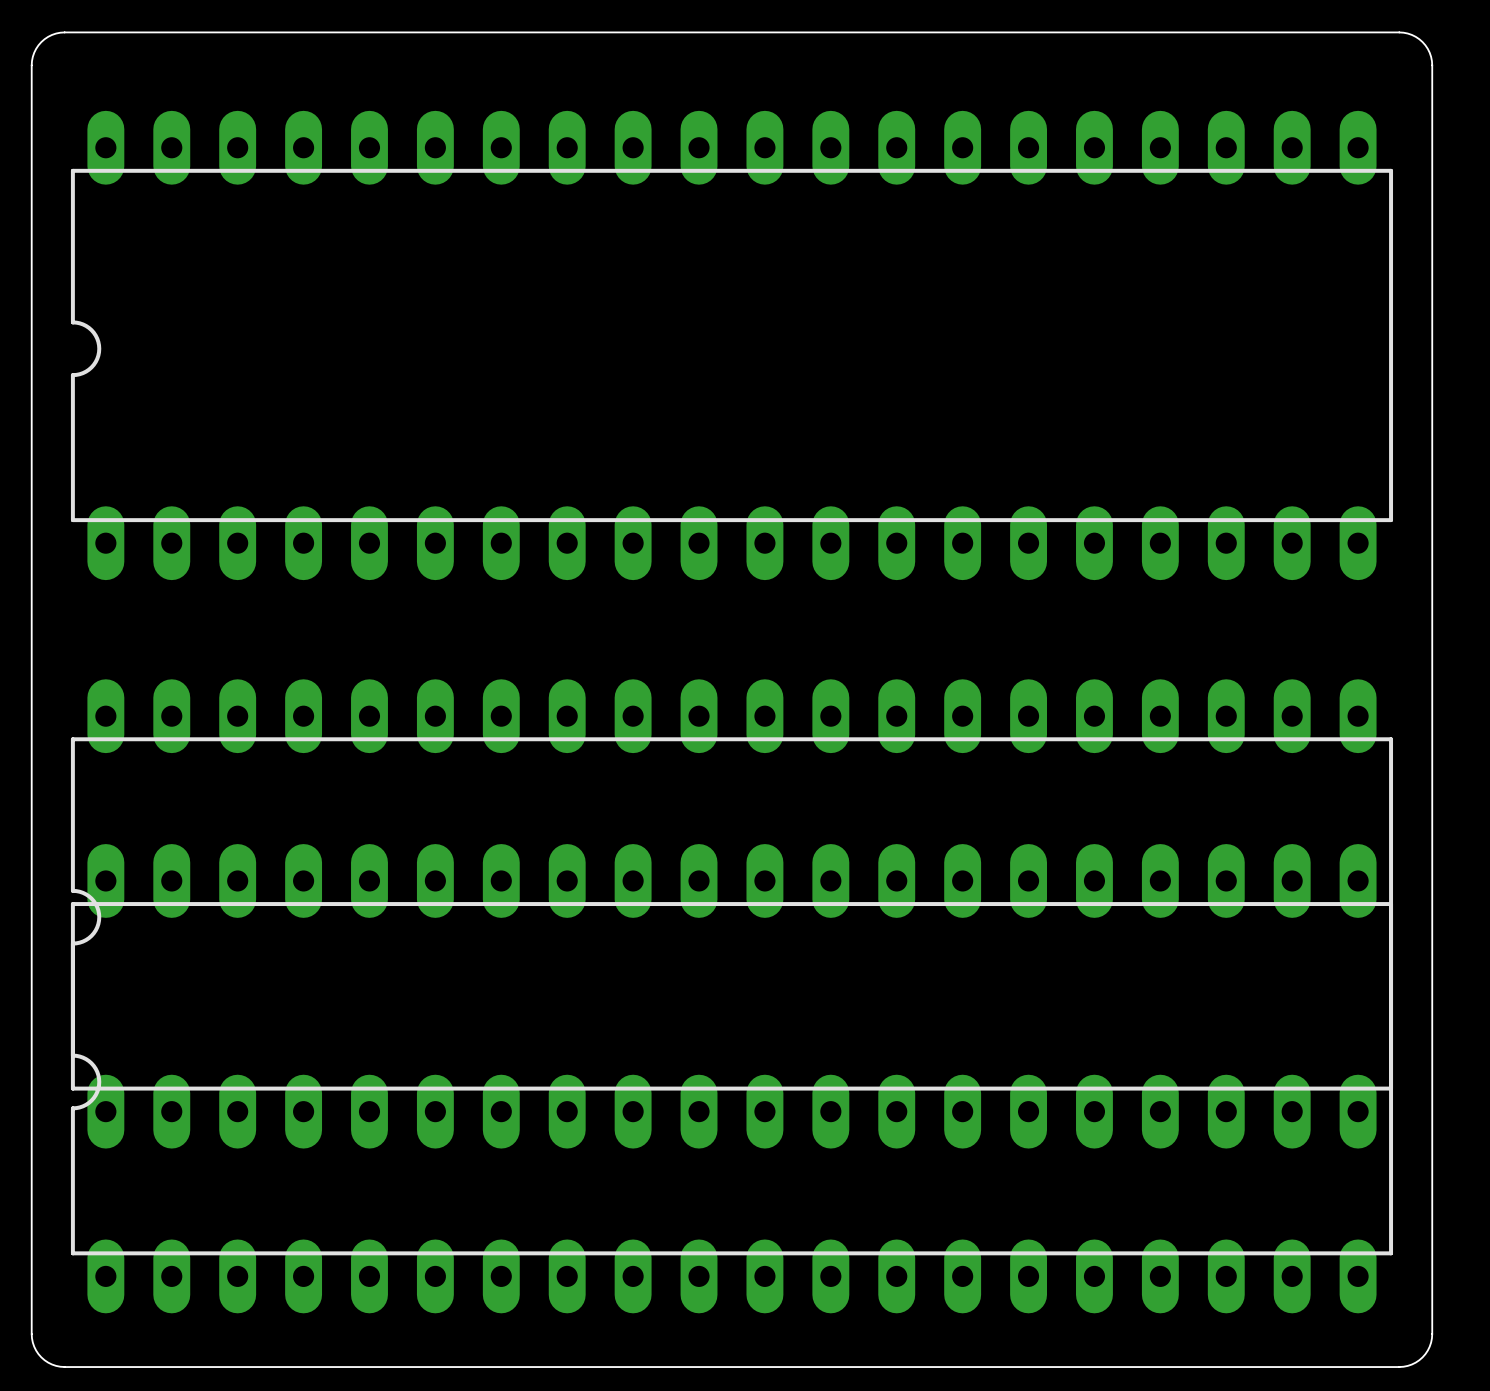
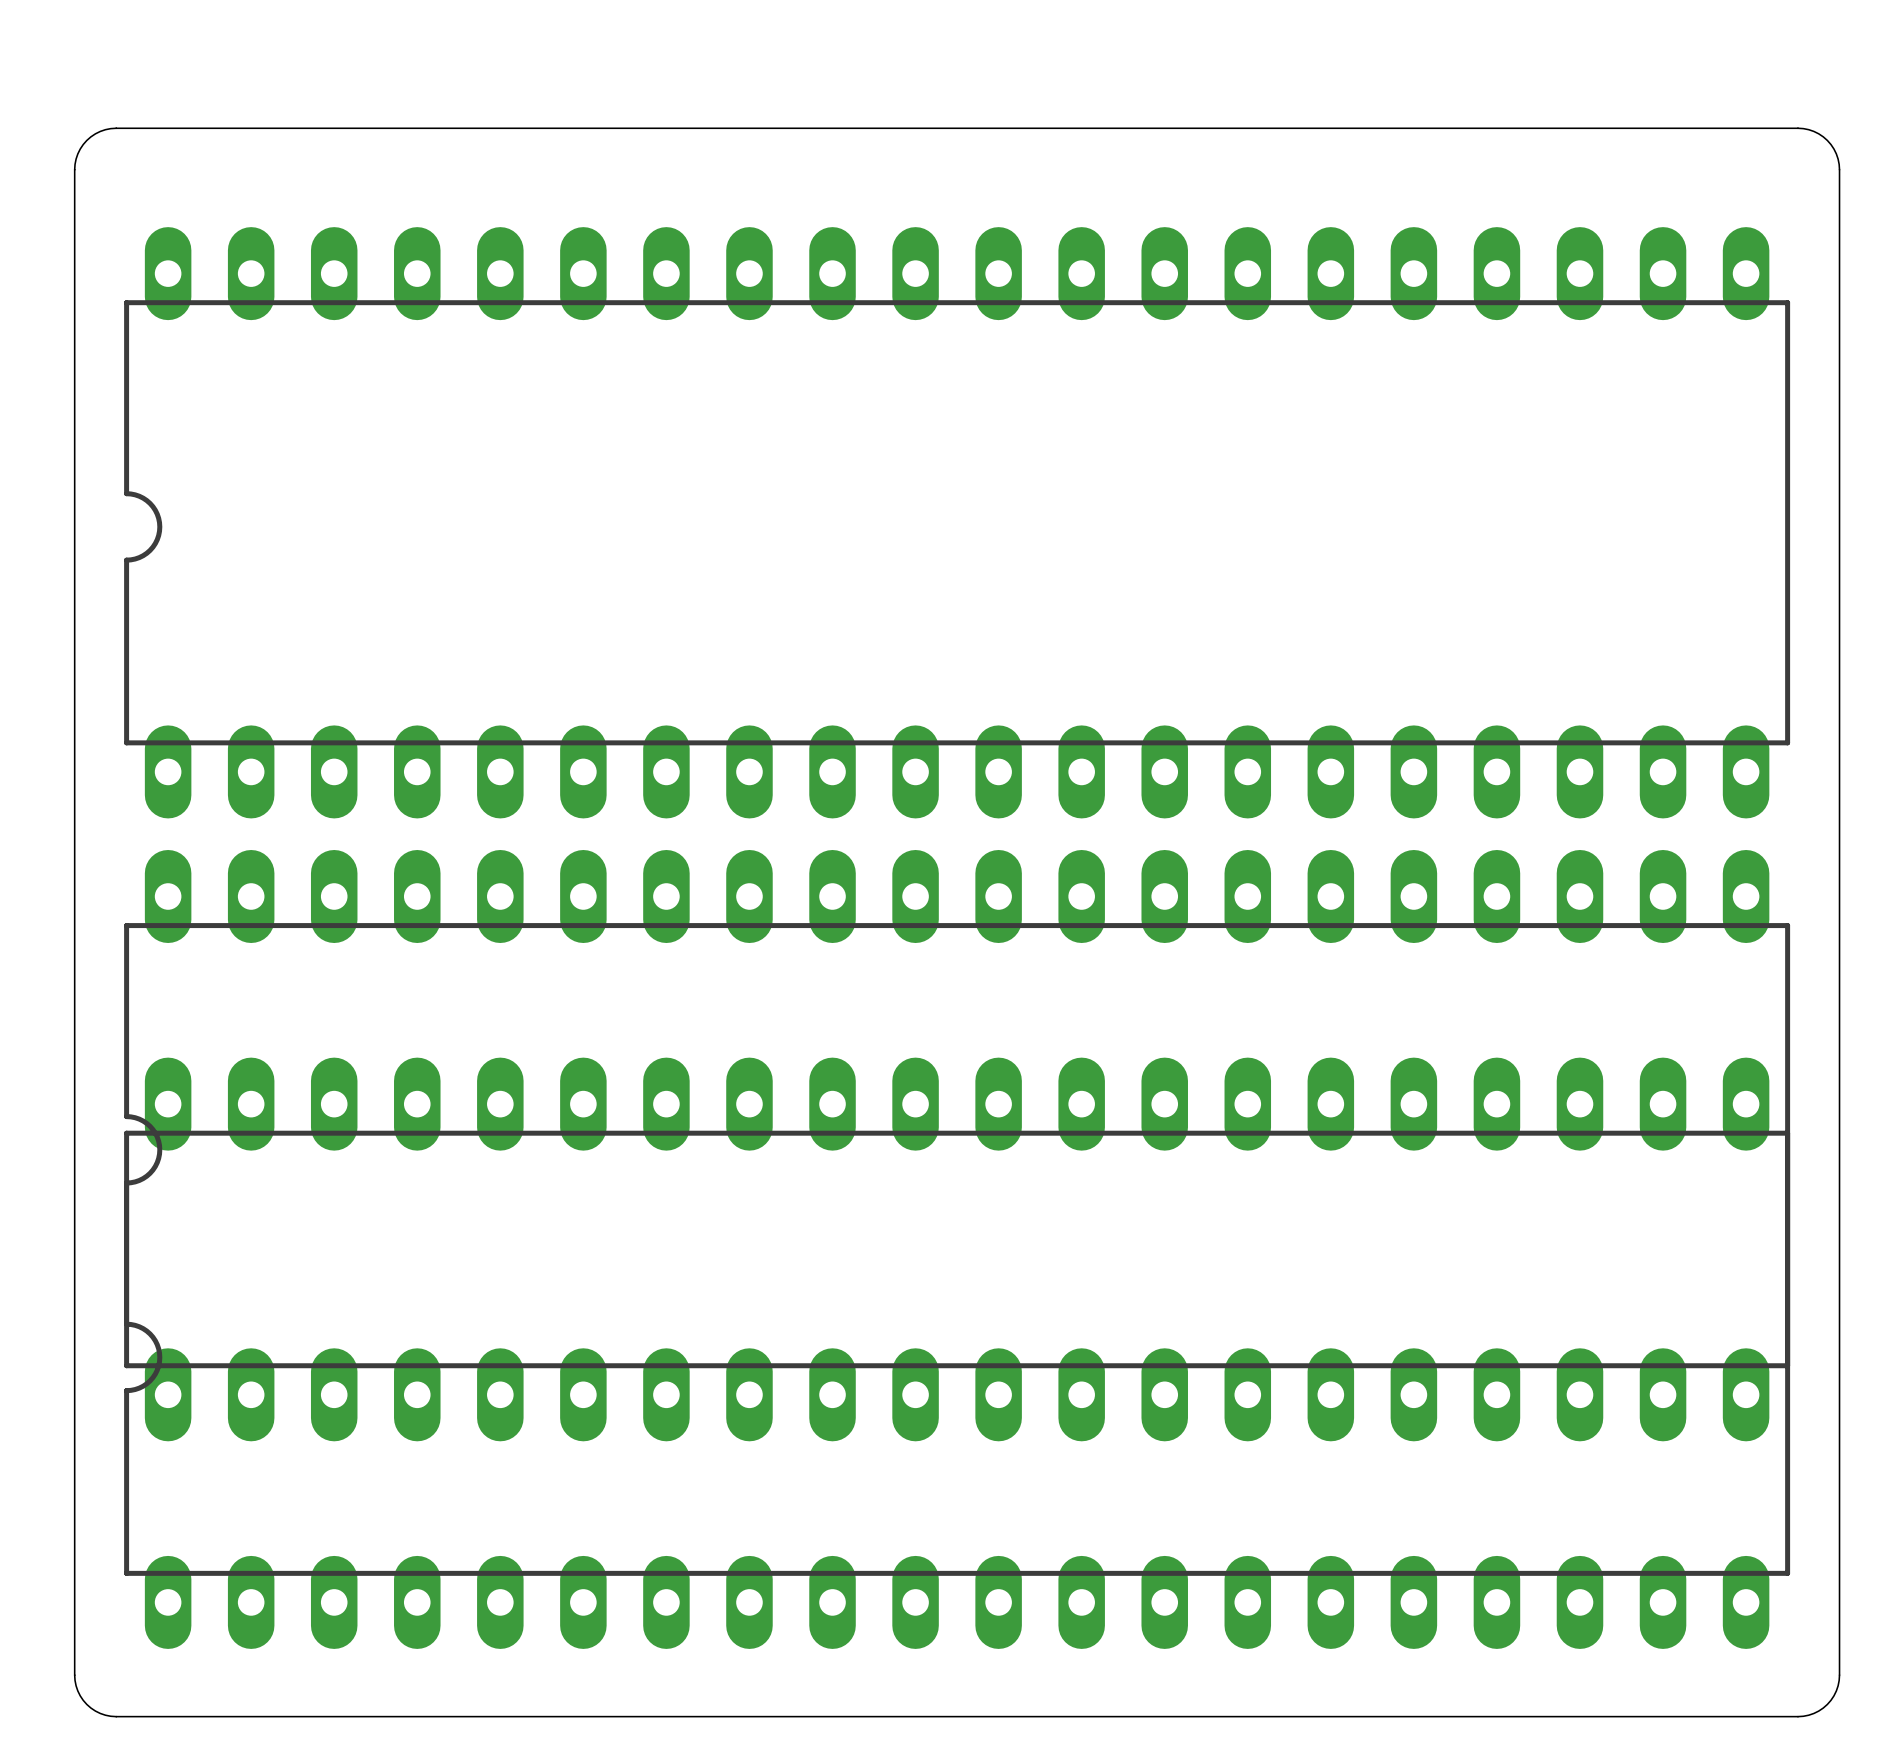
board edge: (31, 139) (32, 56) (36, 48) (44, 39) (56, 33) (64, 32) (1403, 32) (1419, 39) (1427, 48) (1431, 56) (1432, 139) -> (74, 169) (77, 153) (86, 140) (100, 131) (116, 128) (1797, 128) (1813, 131) (1827, 140) (1836, 153) (1839, 169)
part position: (731, 345) -> (957, 522)

